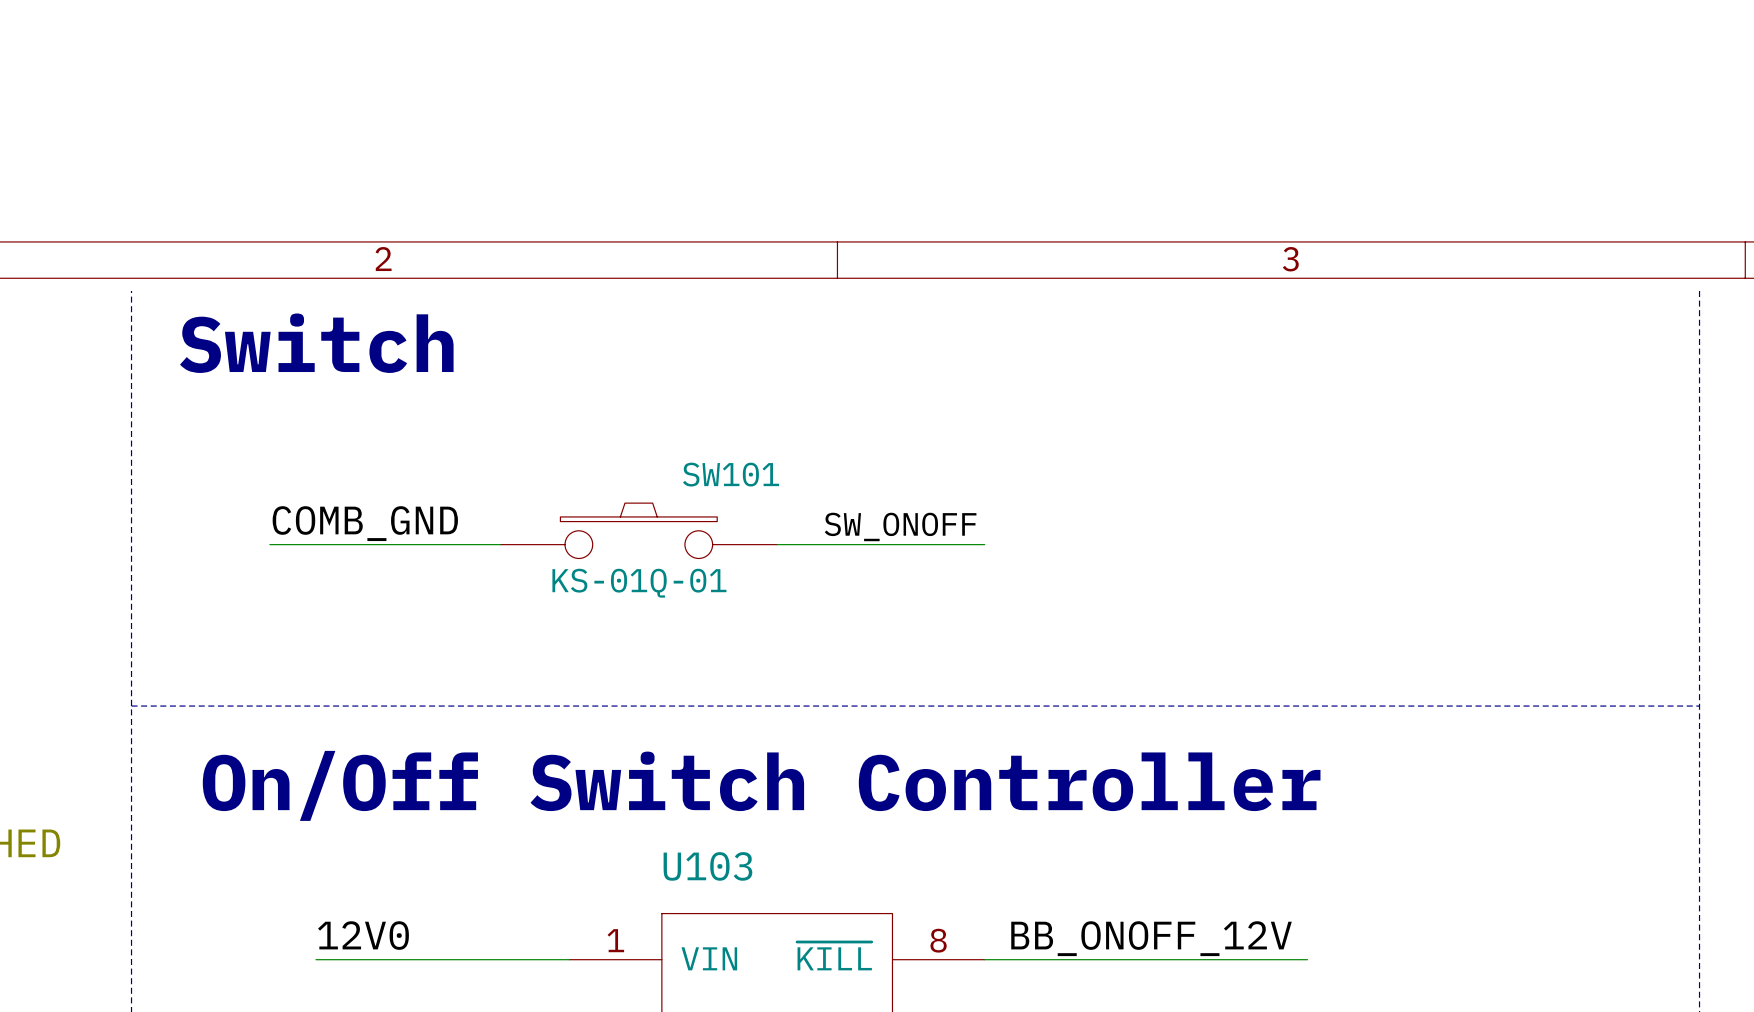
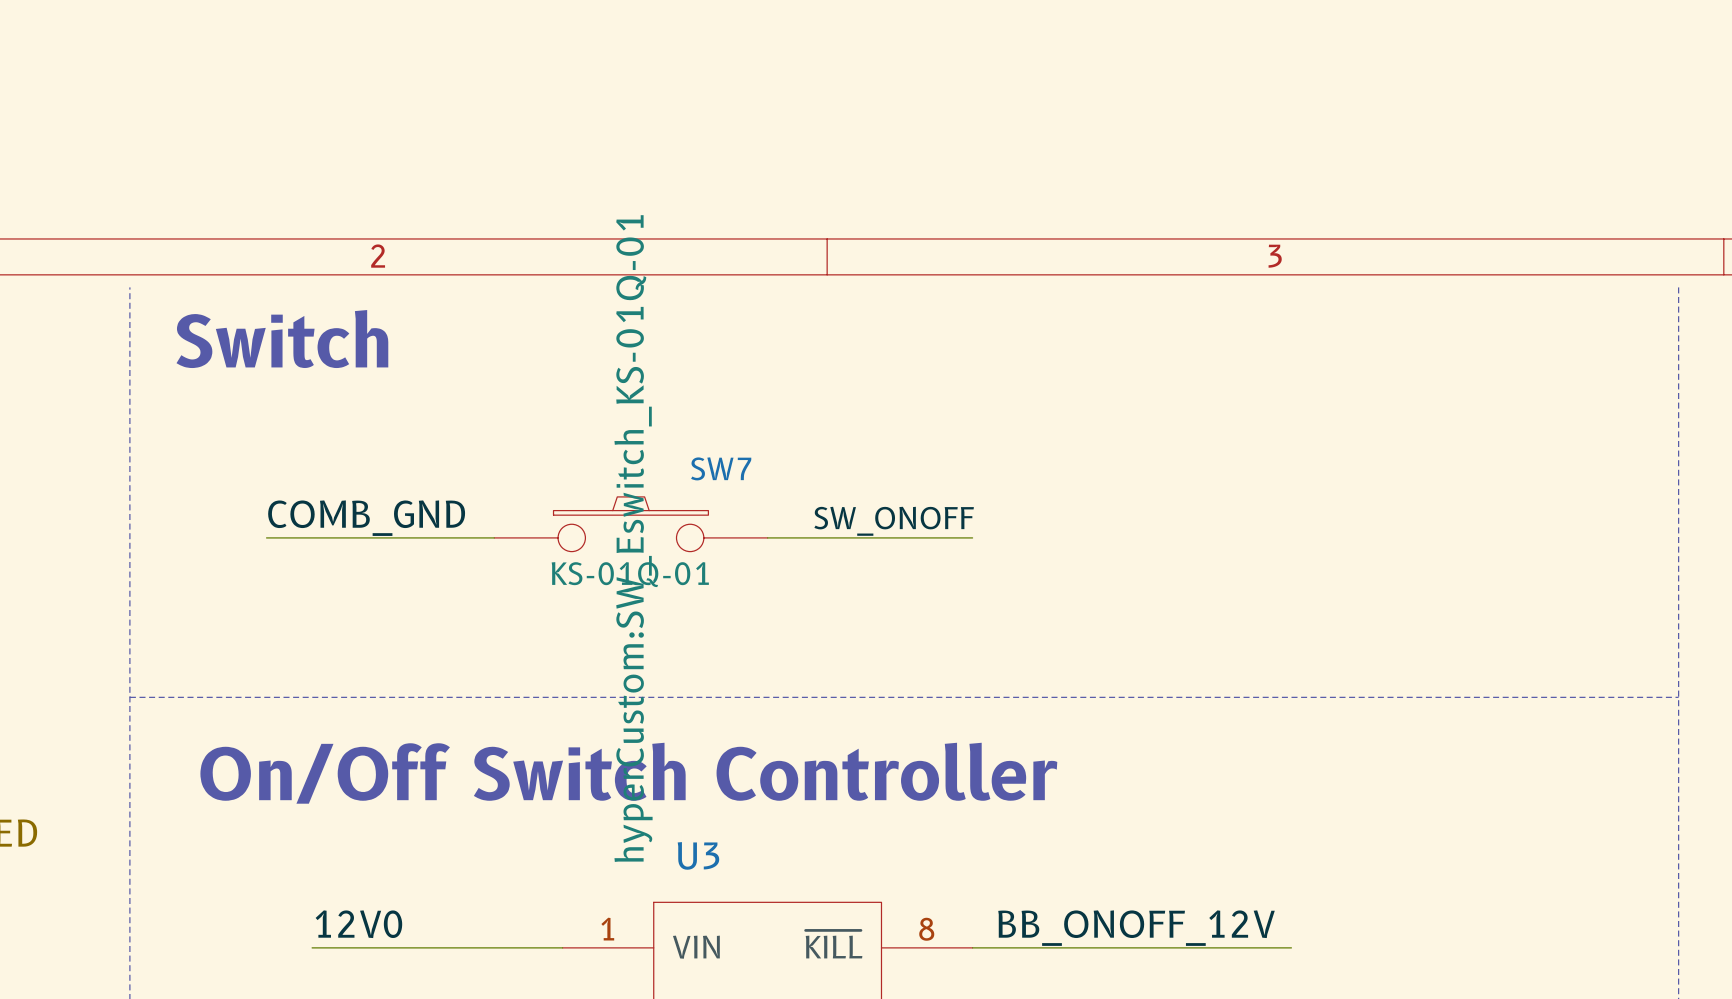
SW101 name: SW101 (731, 474) -> SW7 (721, 468)
SW101 text: none -> hyperCustom:SW_Eswitch_KS-01Q-01 (633, 538)
U103 name: U103 (707, 866) -> U3 (698, 855)

